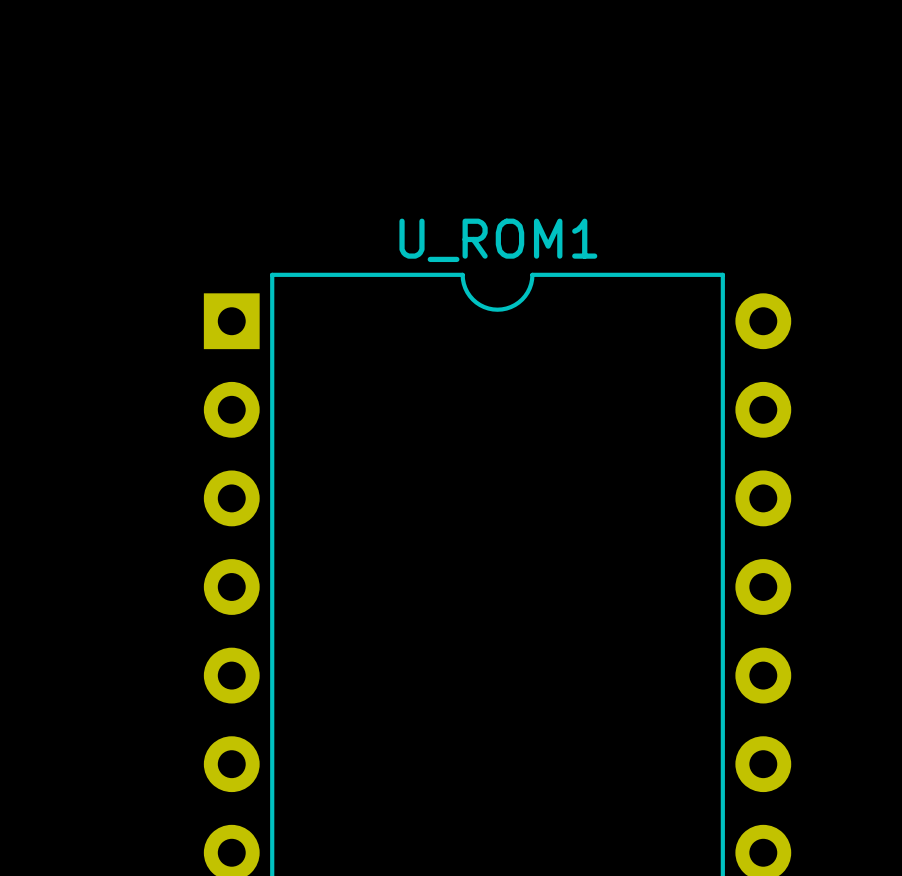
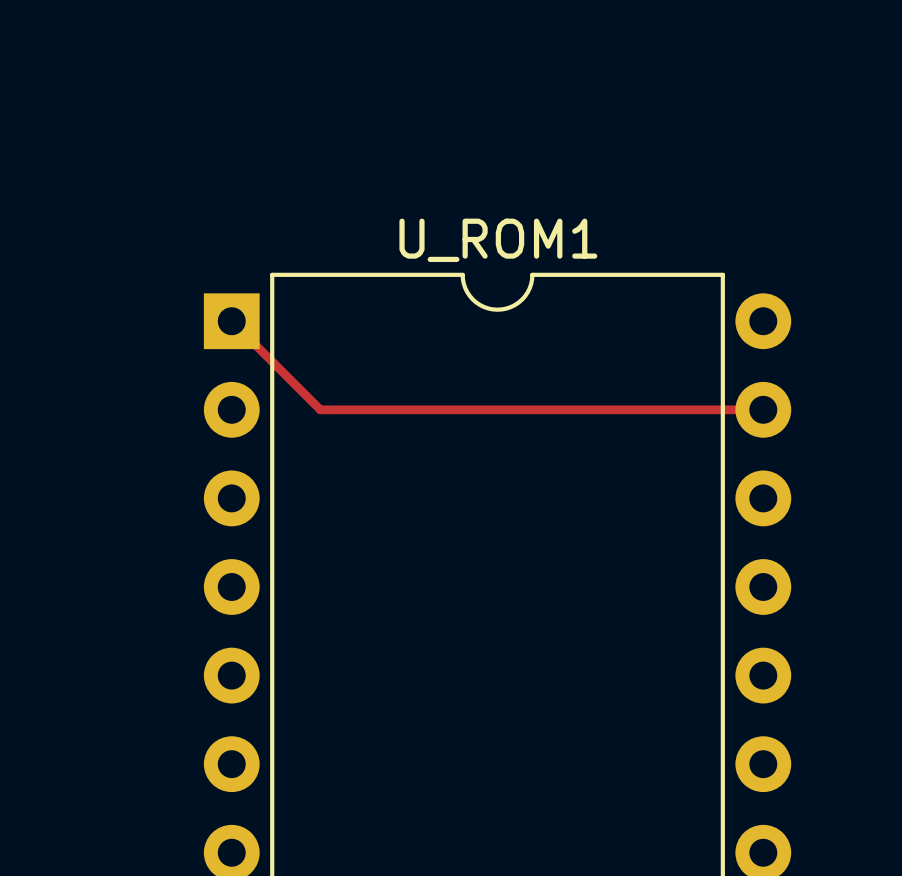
track: none -> (231, 321) (320, 409) (763, 409)

